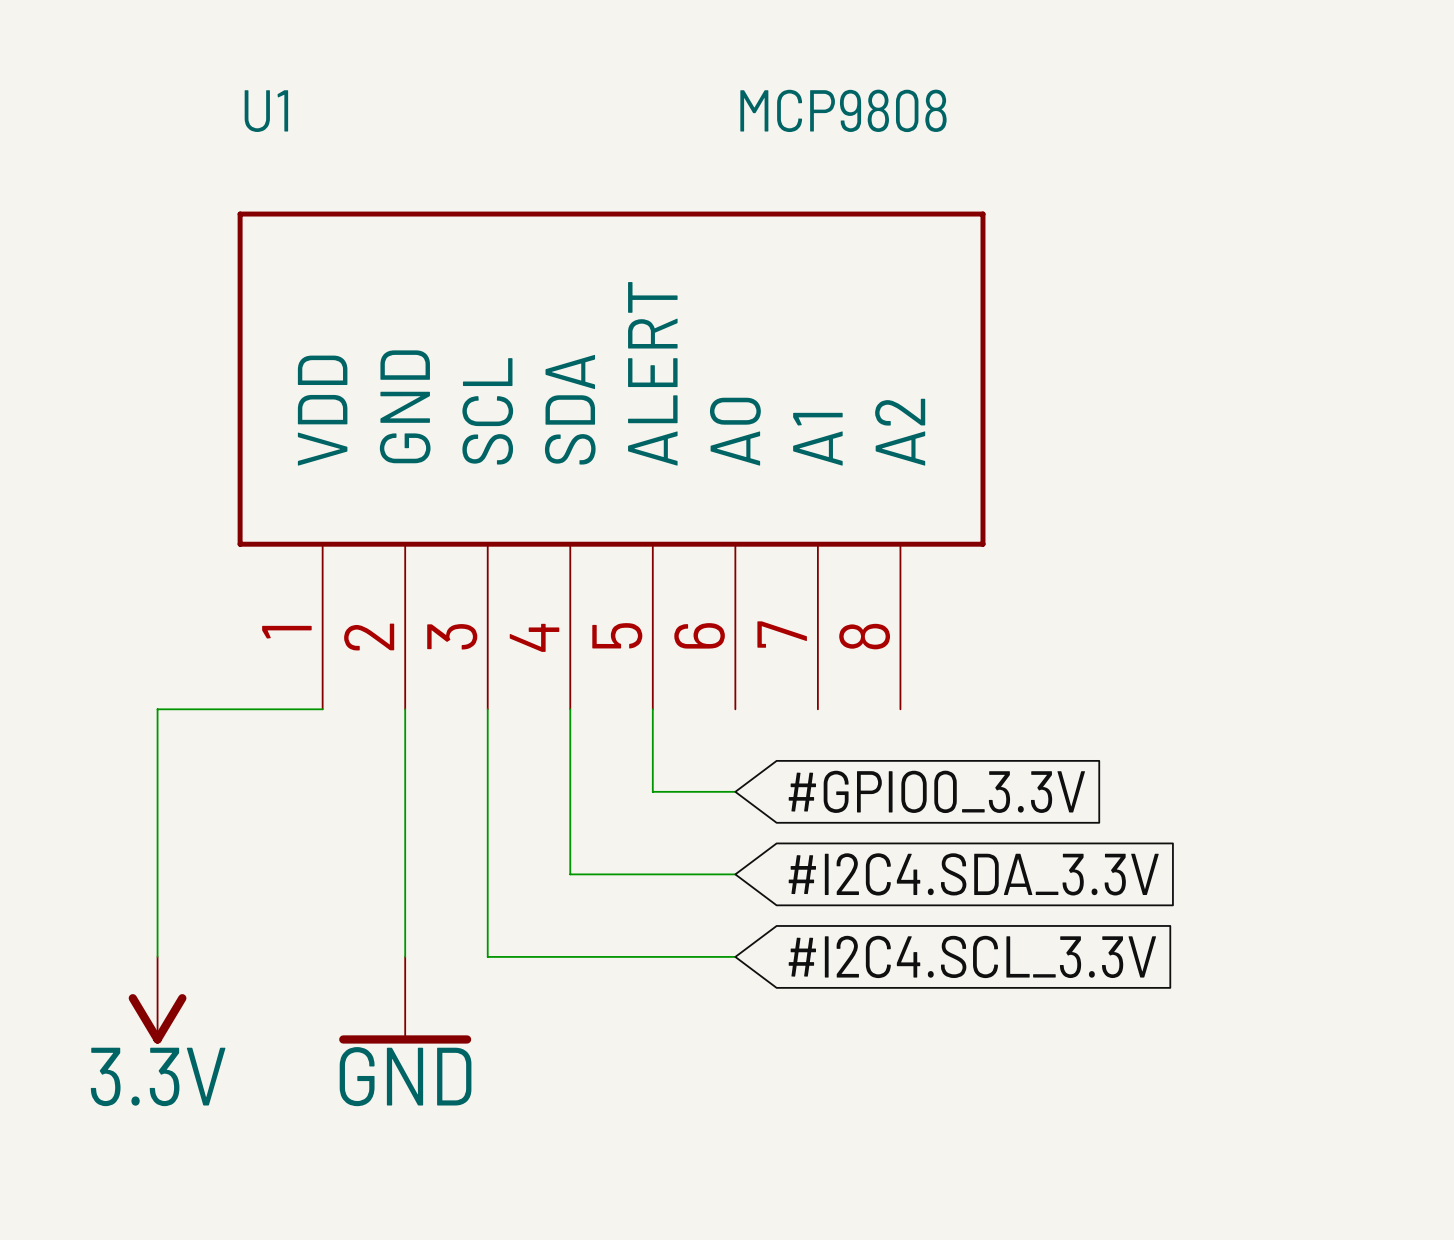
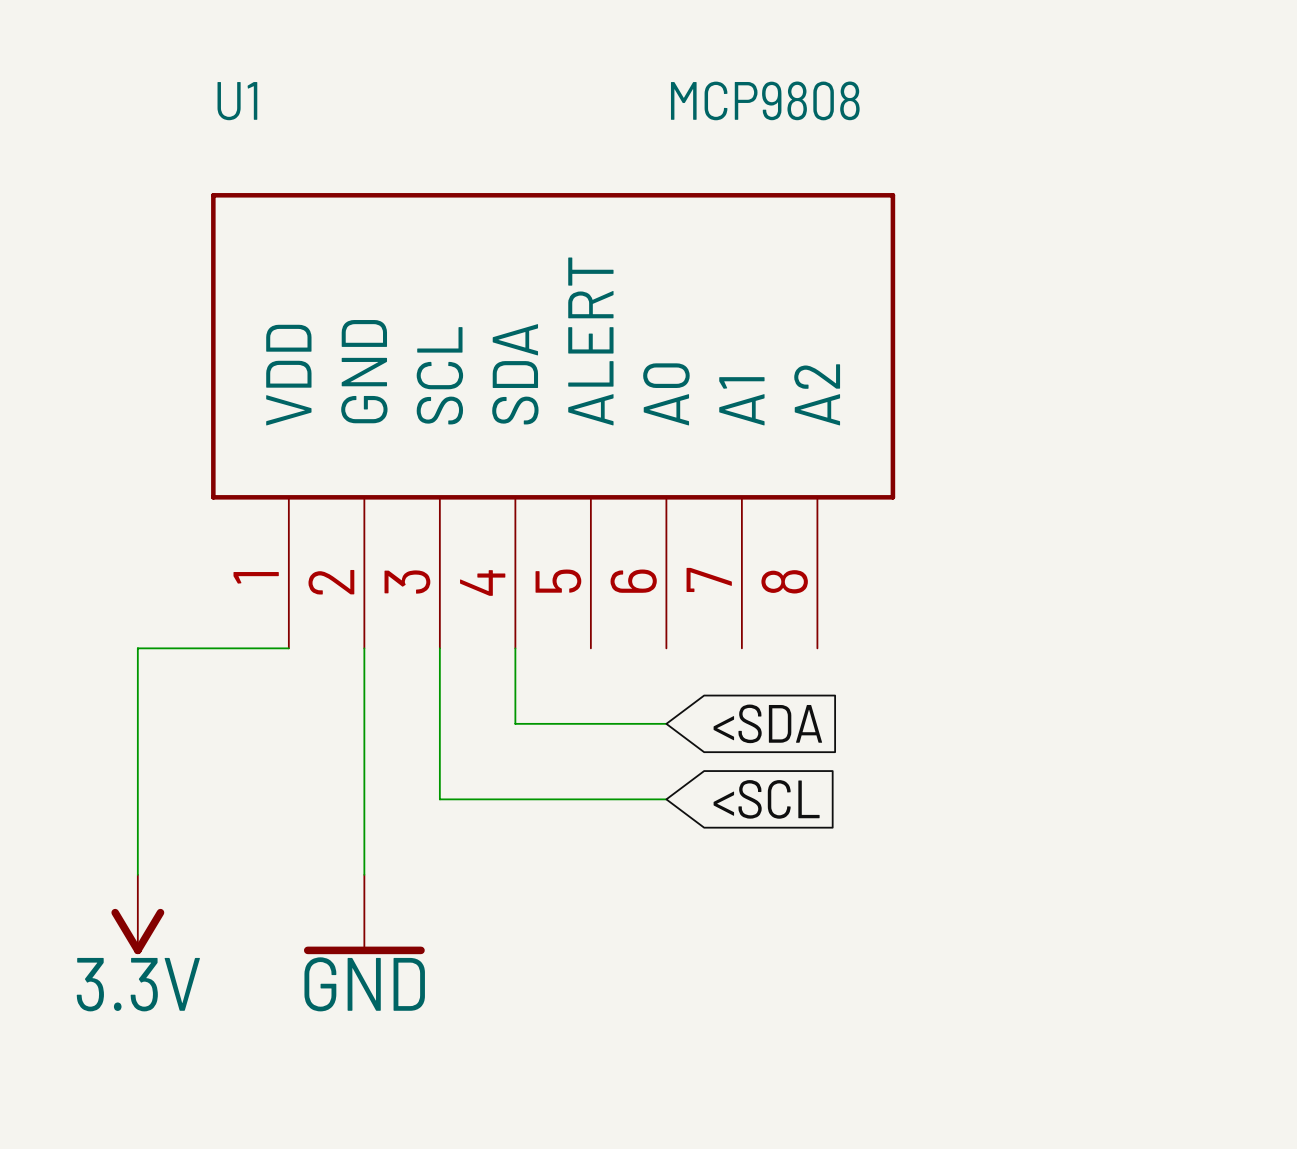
wire: (652, 709) (652, 791) -> (515, 723) (590, 723)
wire: (570, 791) (570, 874) -> (439, 799) (515, 799)
global label: #GPIO0_3.3V (936, 791) -> <SDA (767, 723)
wire: (487, 874) (487, 956) (735, 956) -> none
global label: #I2C4.SDA_3.3V (973, 874) -> <SCL (766, 799)
global label: #I2C4.SCL_3.3V (972, 956) -> none

